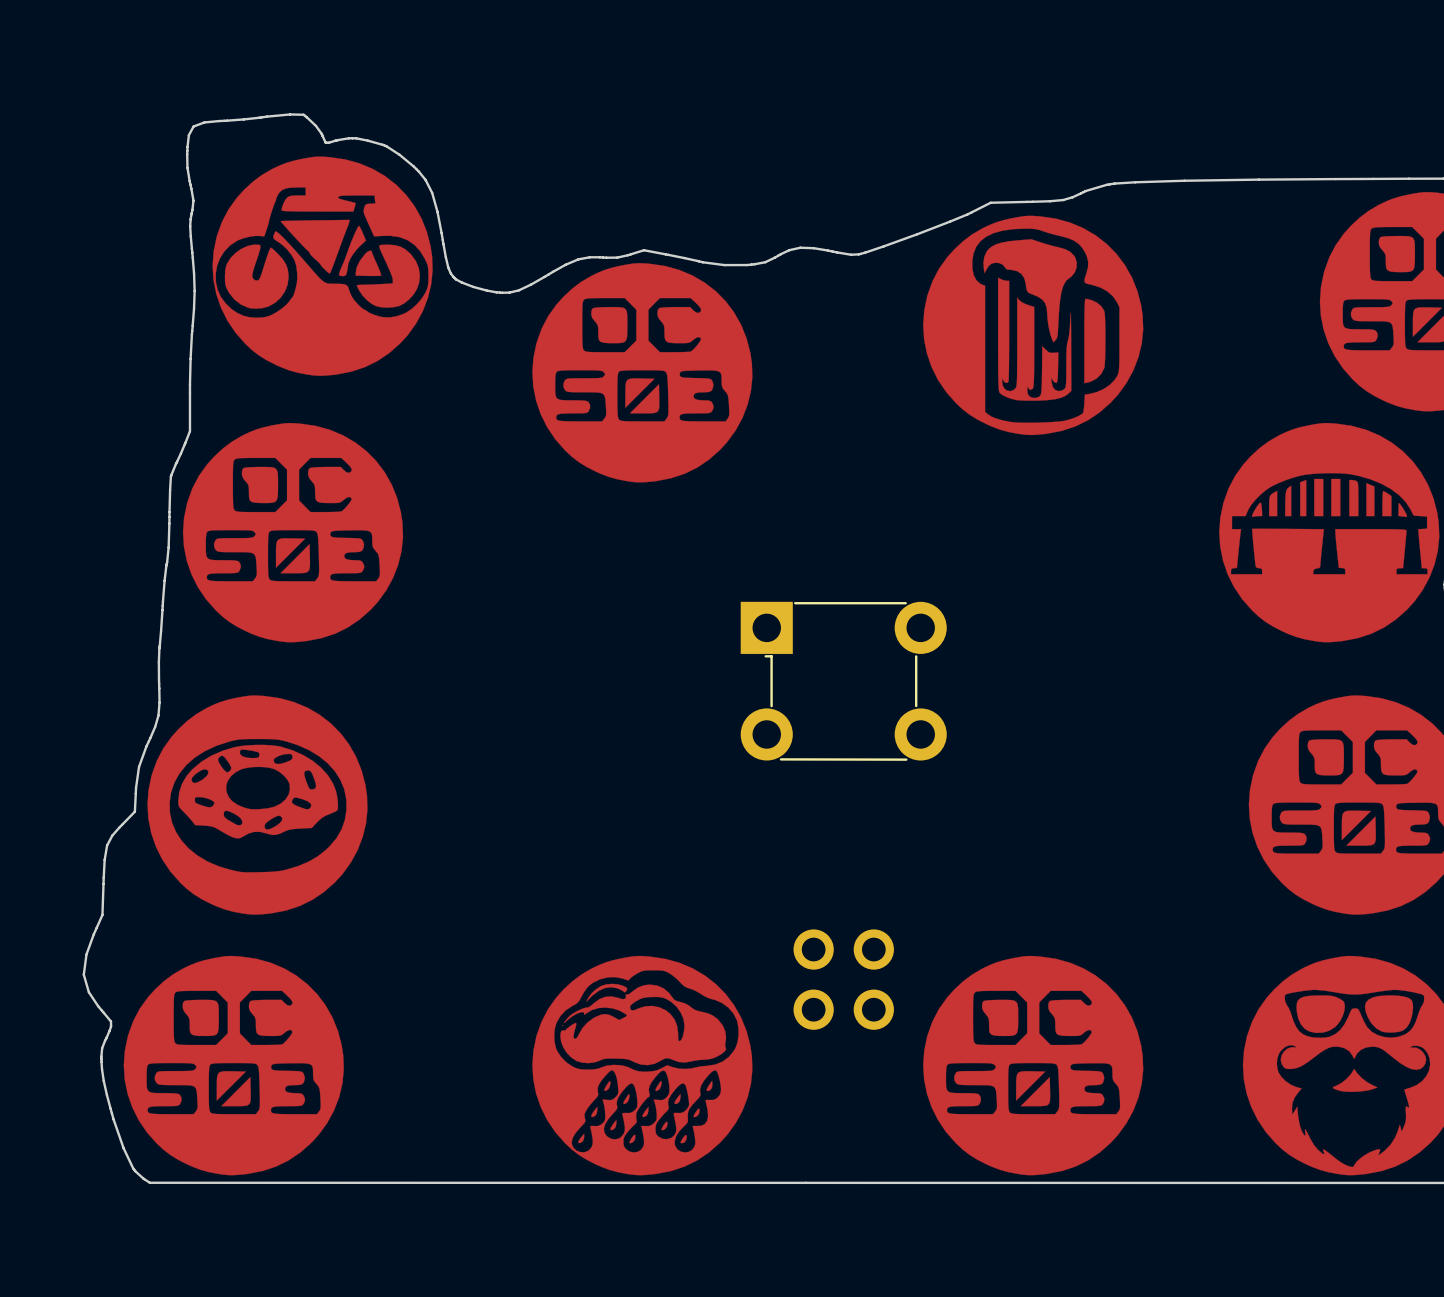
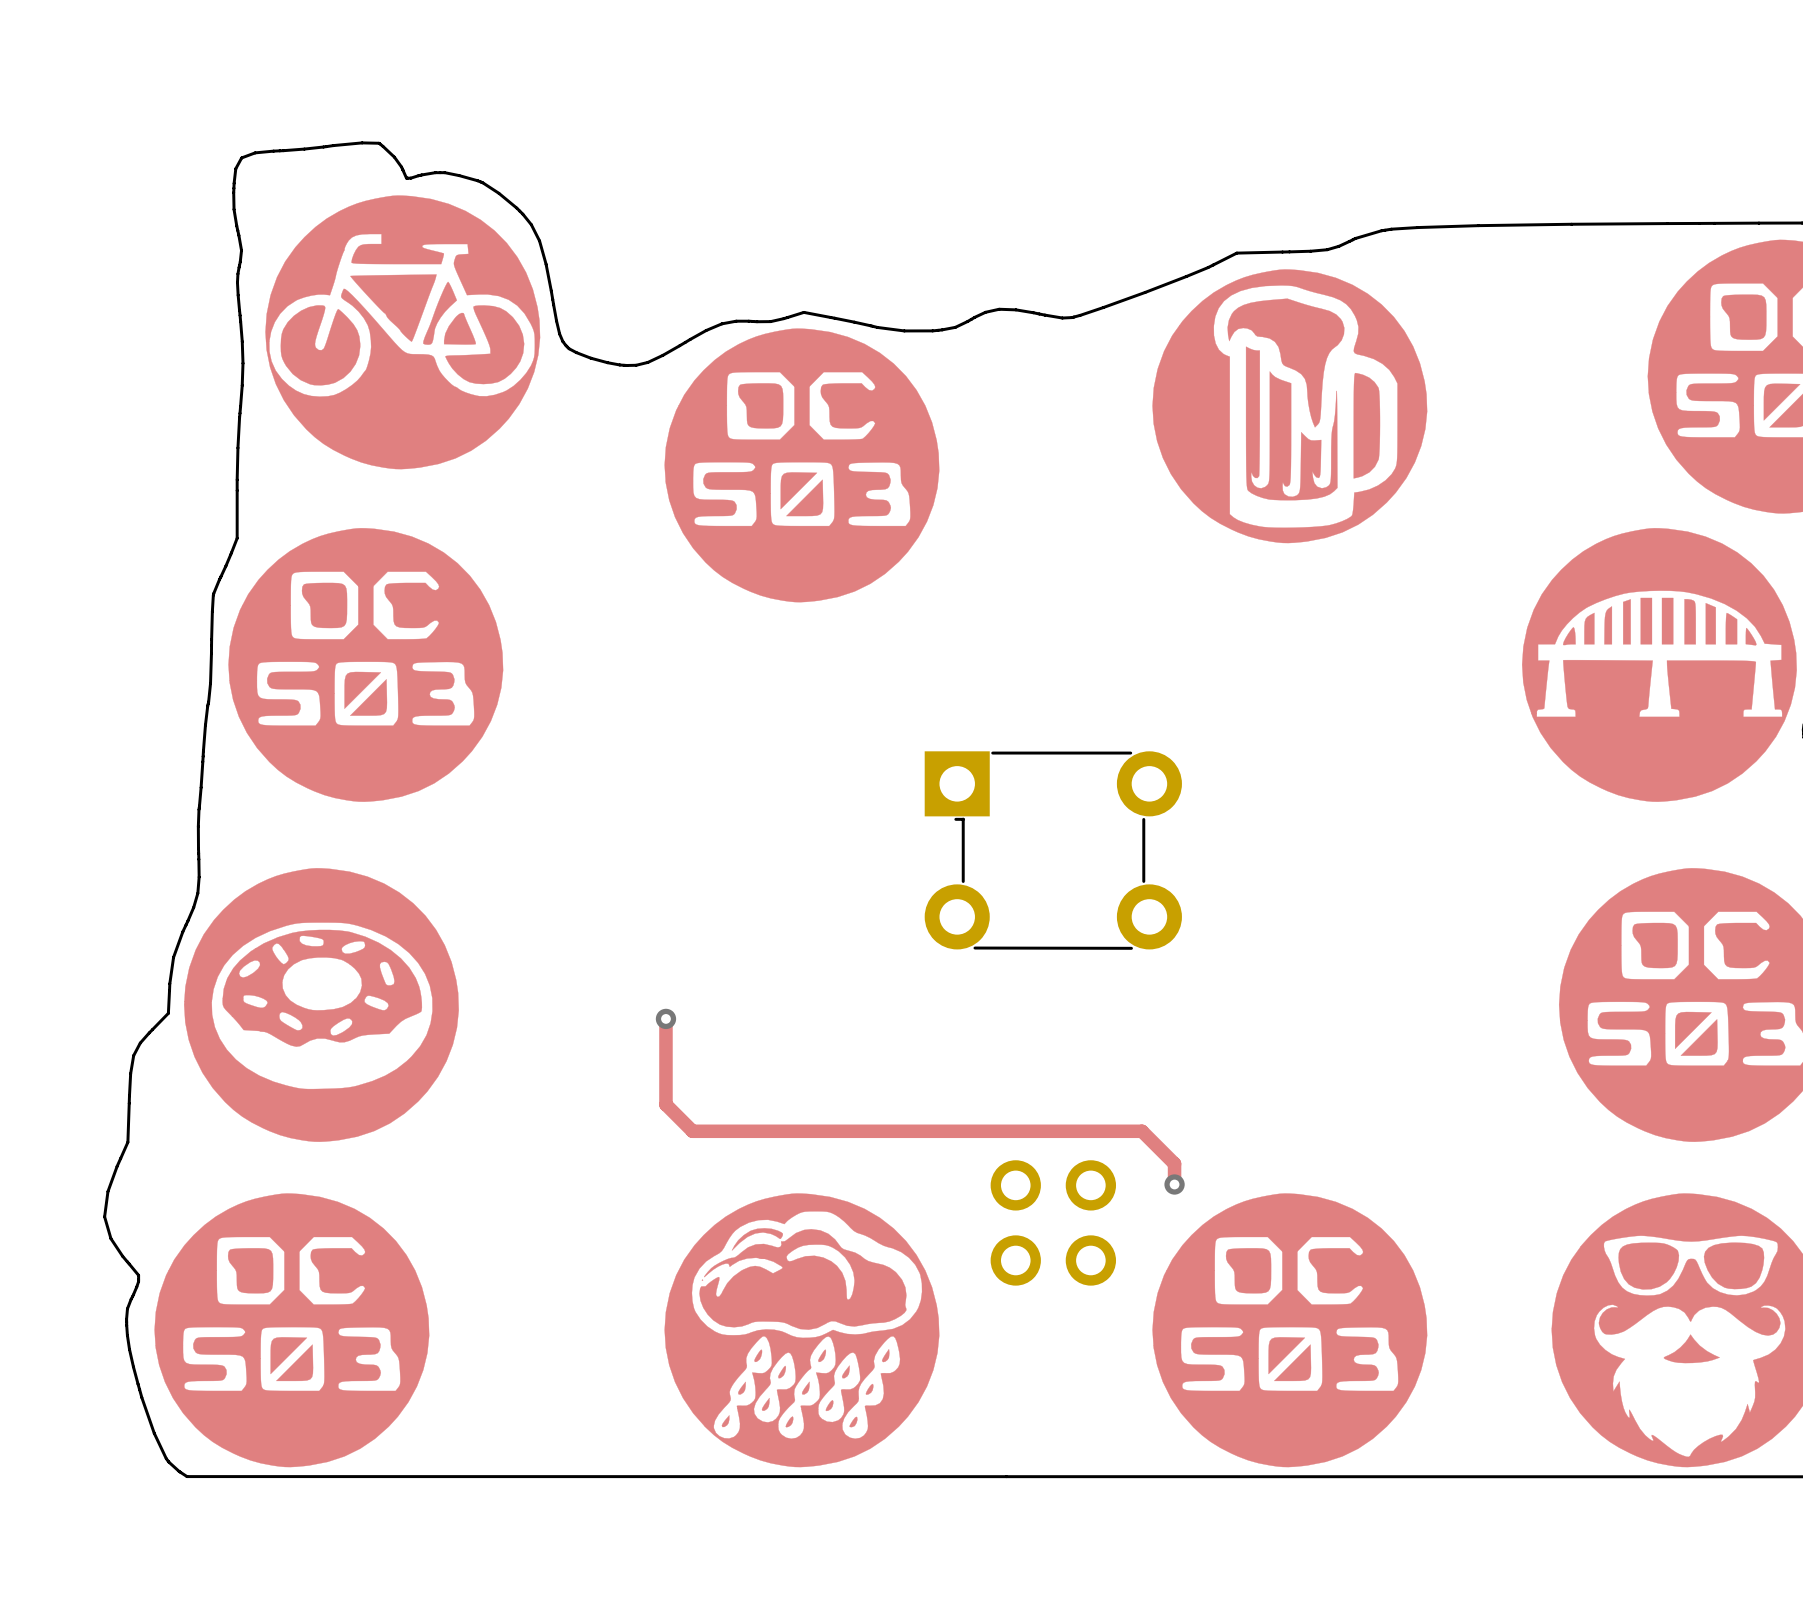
track: none -> (665, 1018) (665, 1104) (692, 1131) (1142, 1131) (1174, 1163) (1174, 1184)
via: none -> (665, 1018)
via: none -> (1174, 1184)

